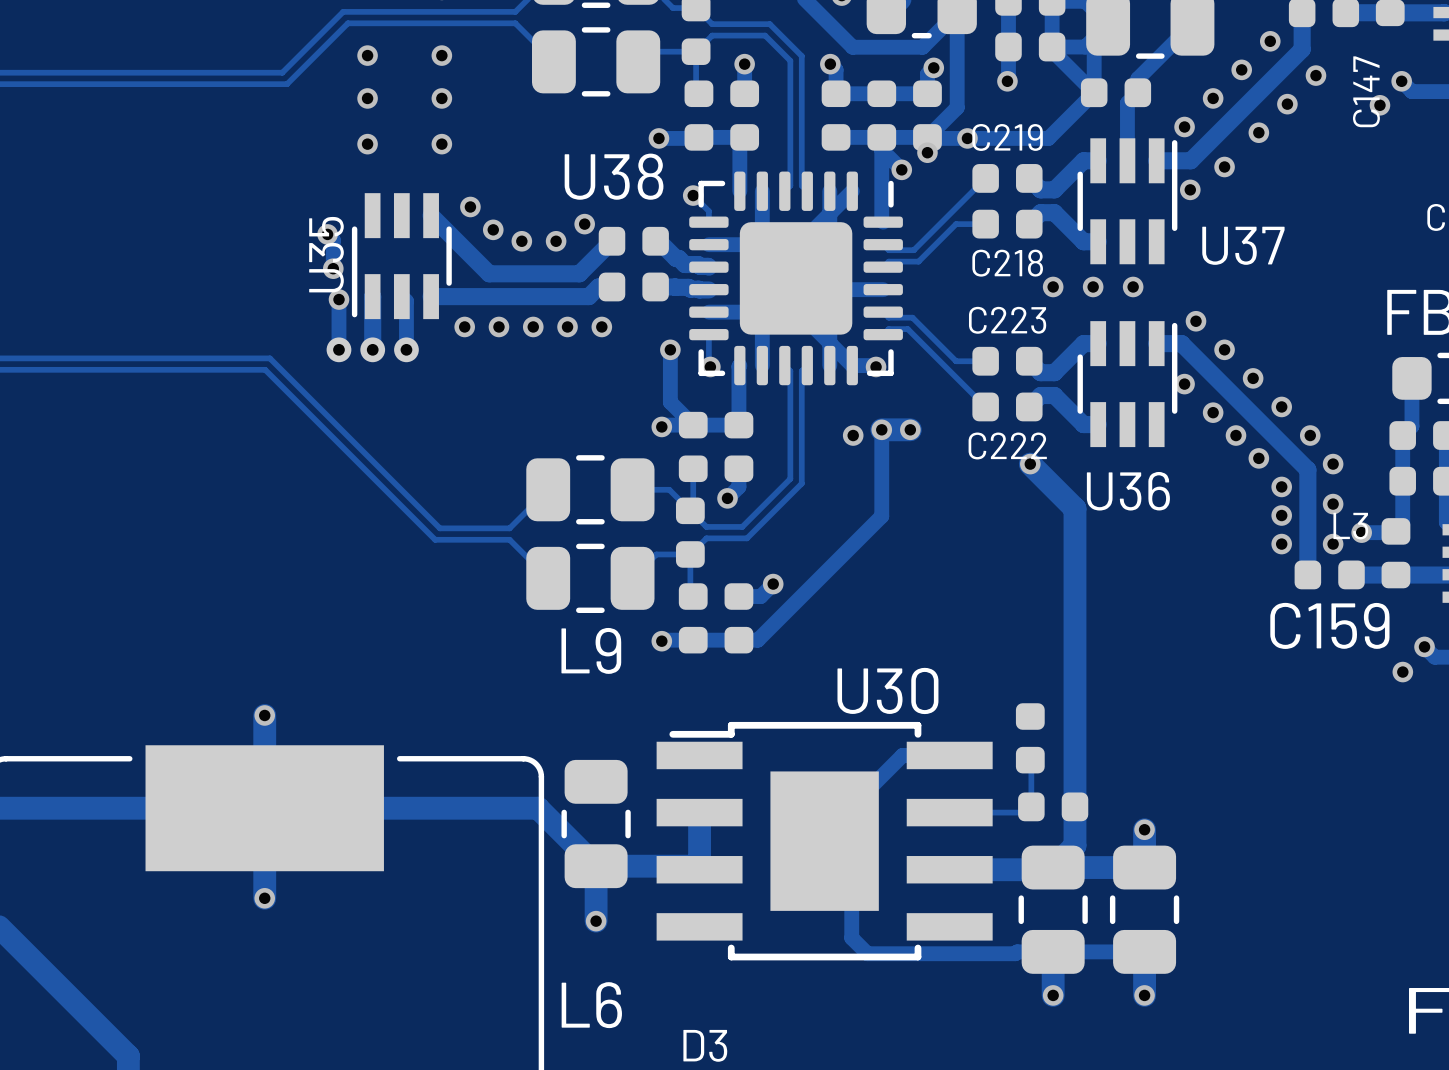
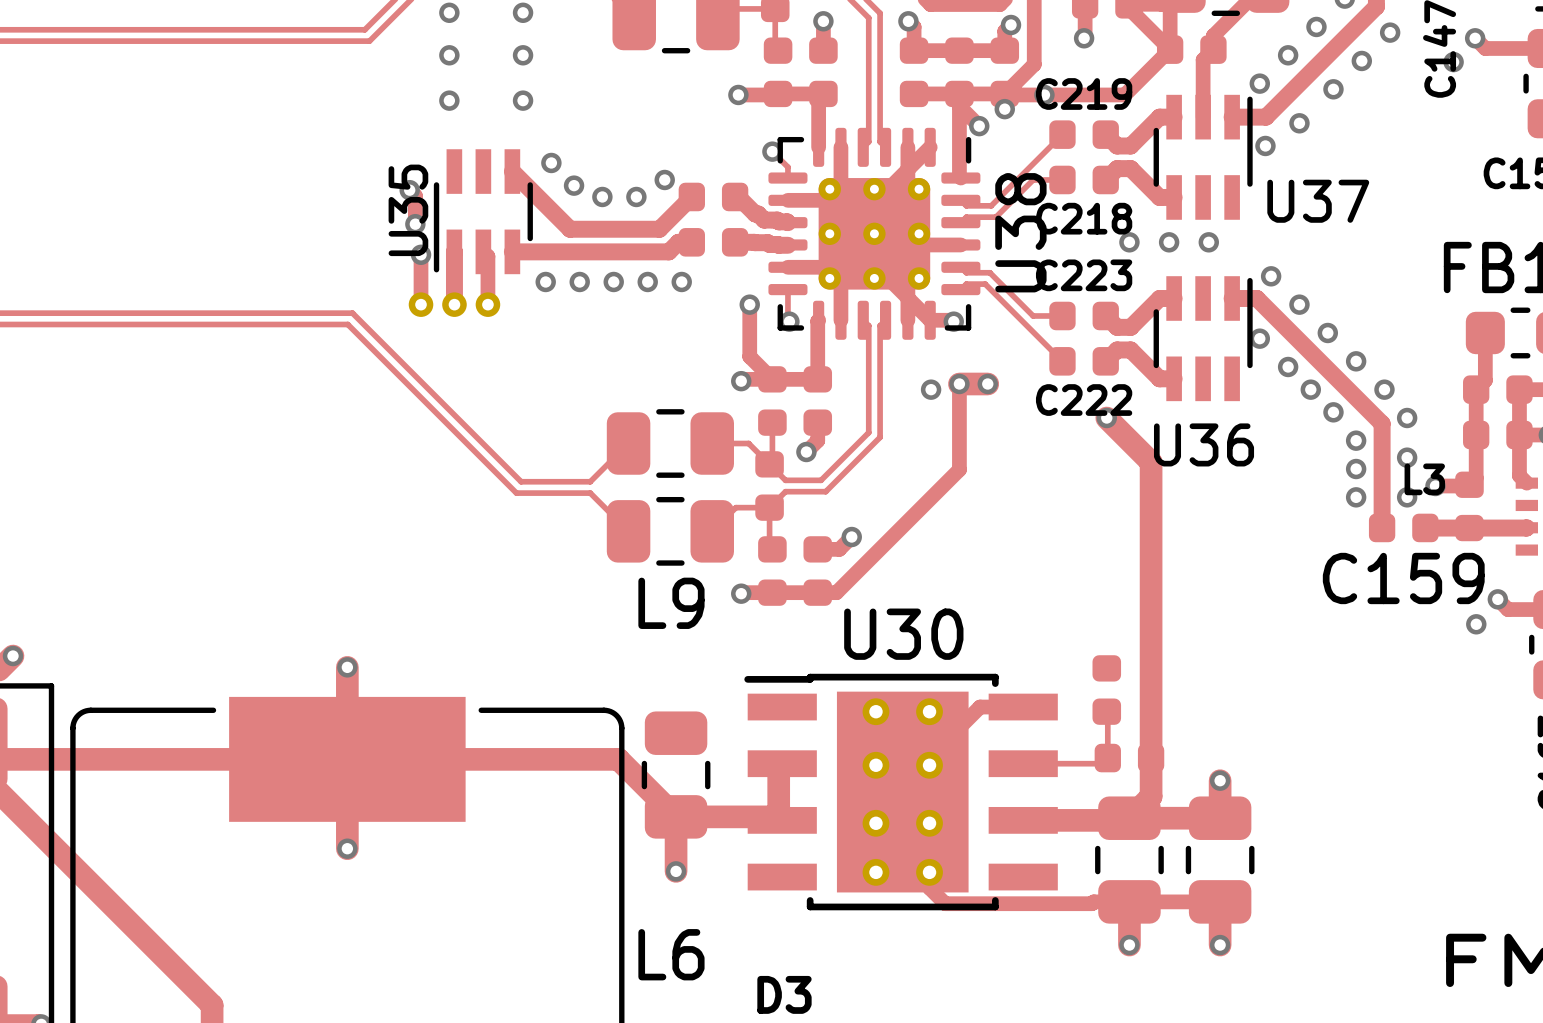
U38 footprint: [689, 171, 903, 386] -> [768, 127, 981, 340]
U38 name position: U38 (614, 176) -> U38 (1020, 232)
U30 footprint: [656, 721, 993, 961] -> [744, 673, 1058, 911]

